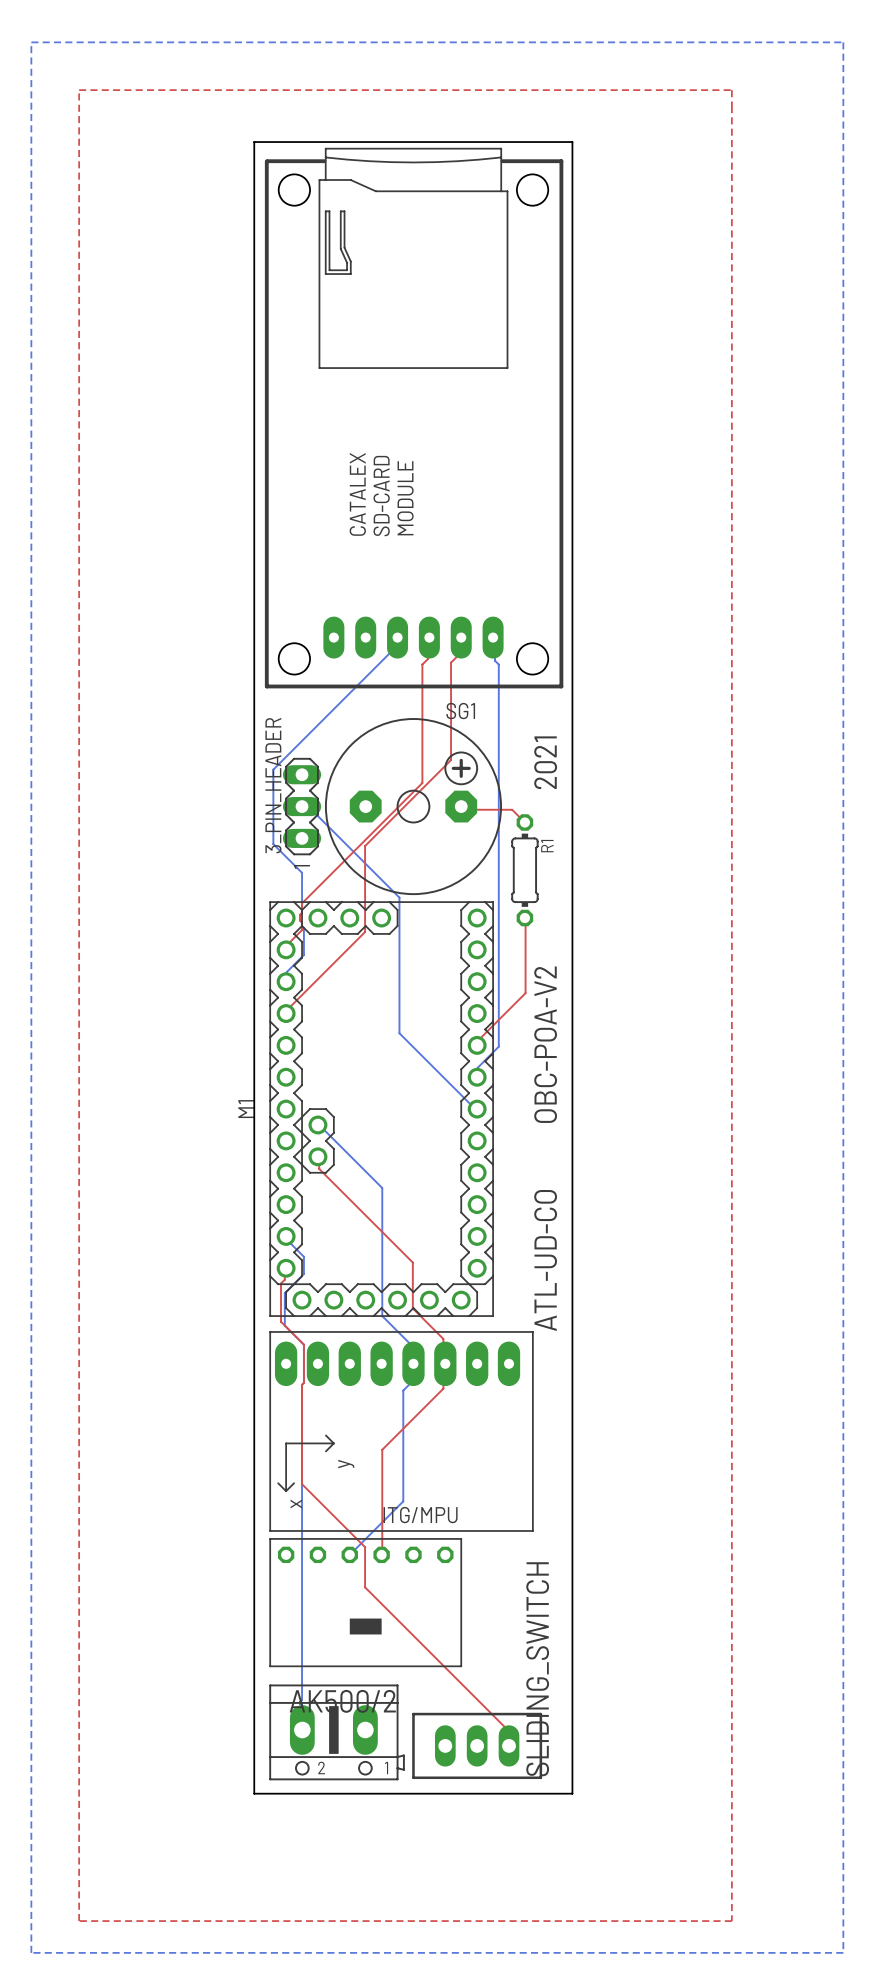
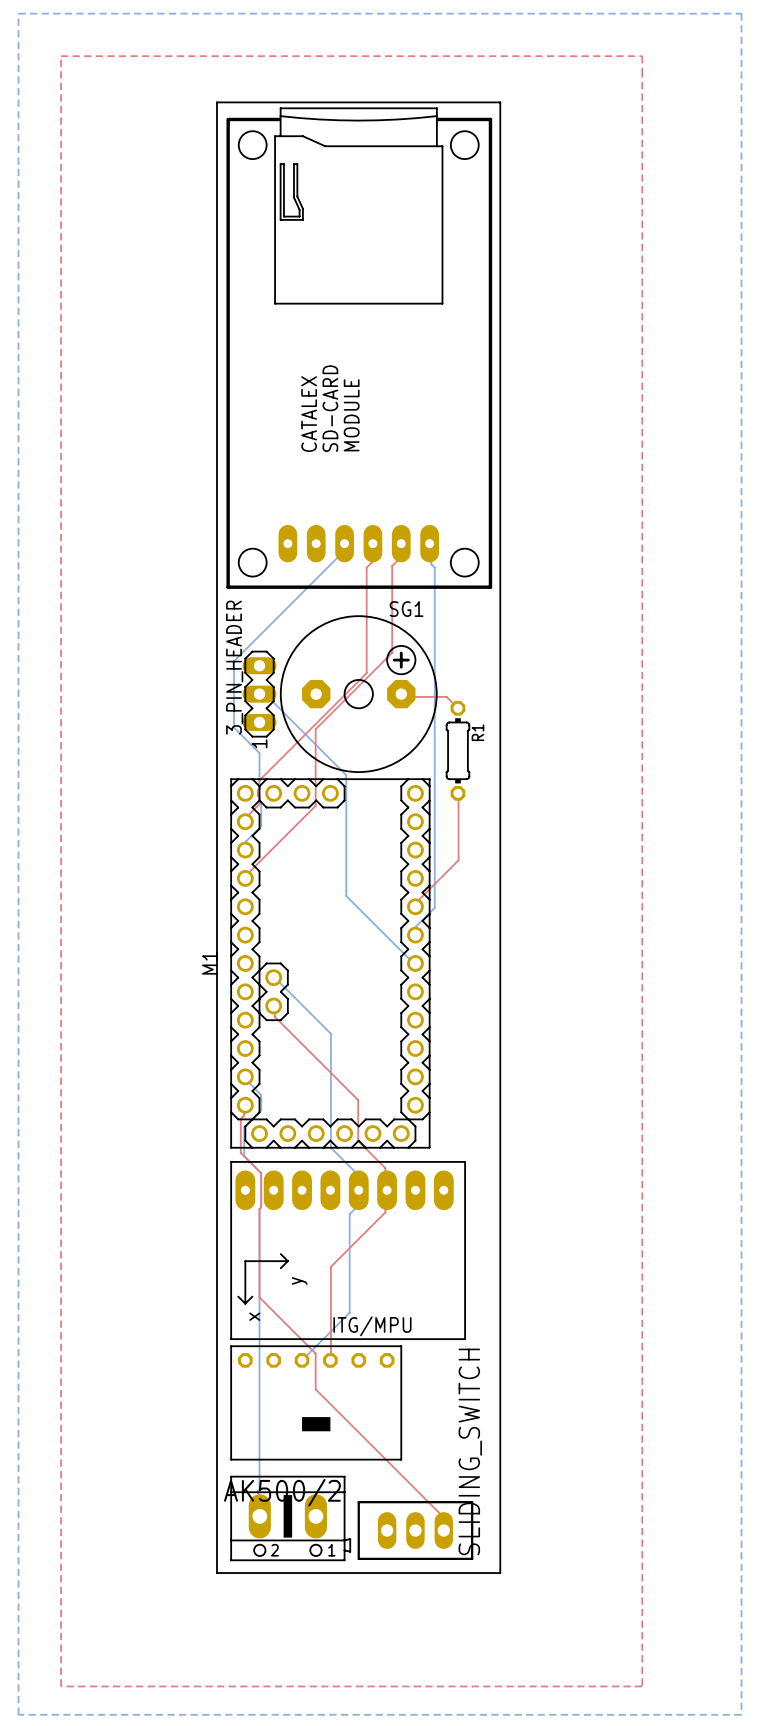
text: 2021 (545, 762) -> none
text: OBC-POA-V2 (545, 1044) -> none
text: ATL-UD-CO (545, 1260) -> none

